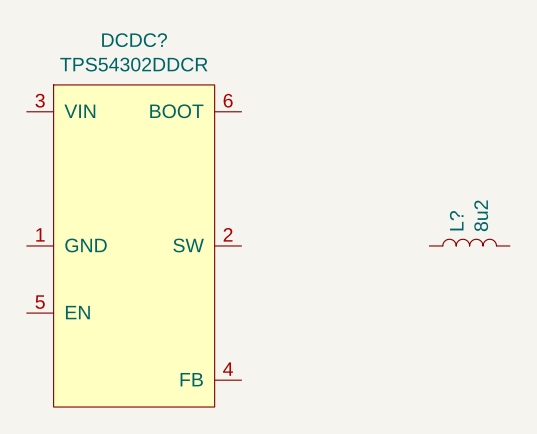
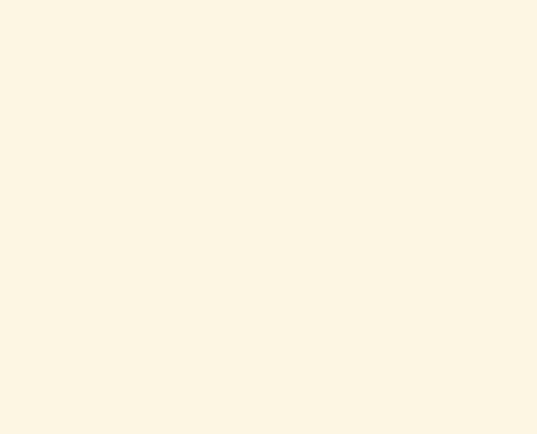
L?: 8u2 (469, 242) -> none
DCDC?: TPS54302DDCR (134, 245) -> none

